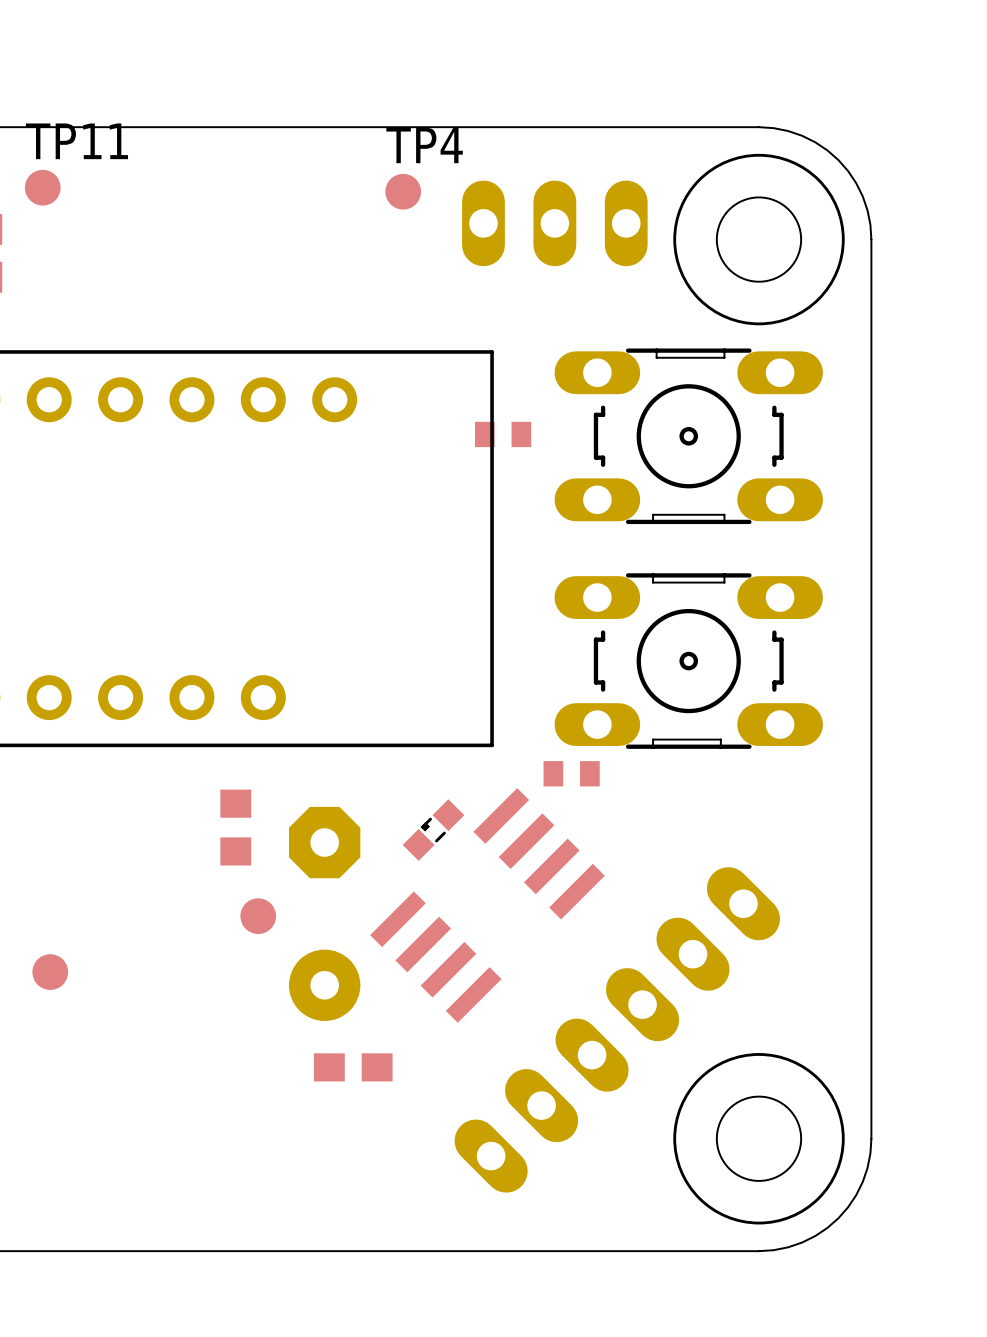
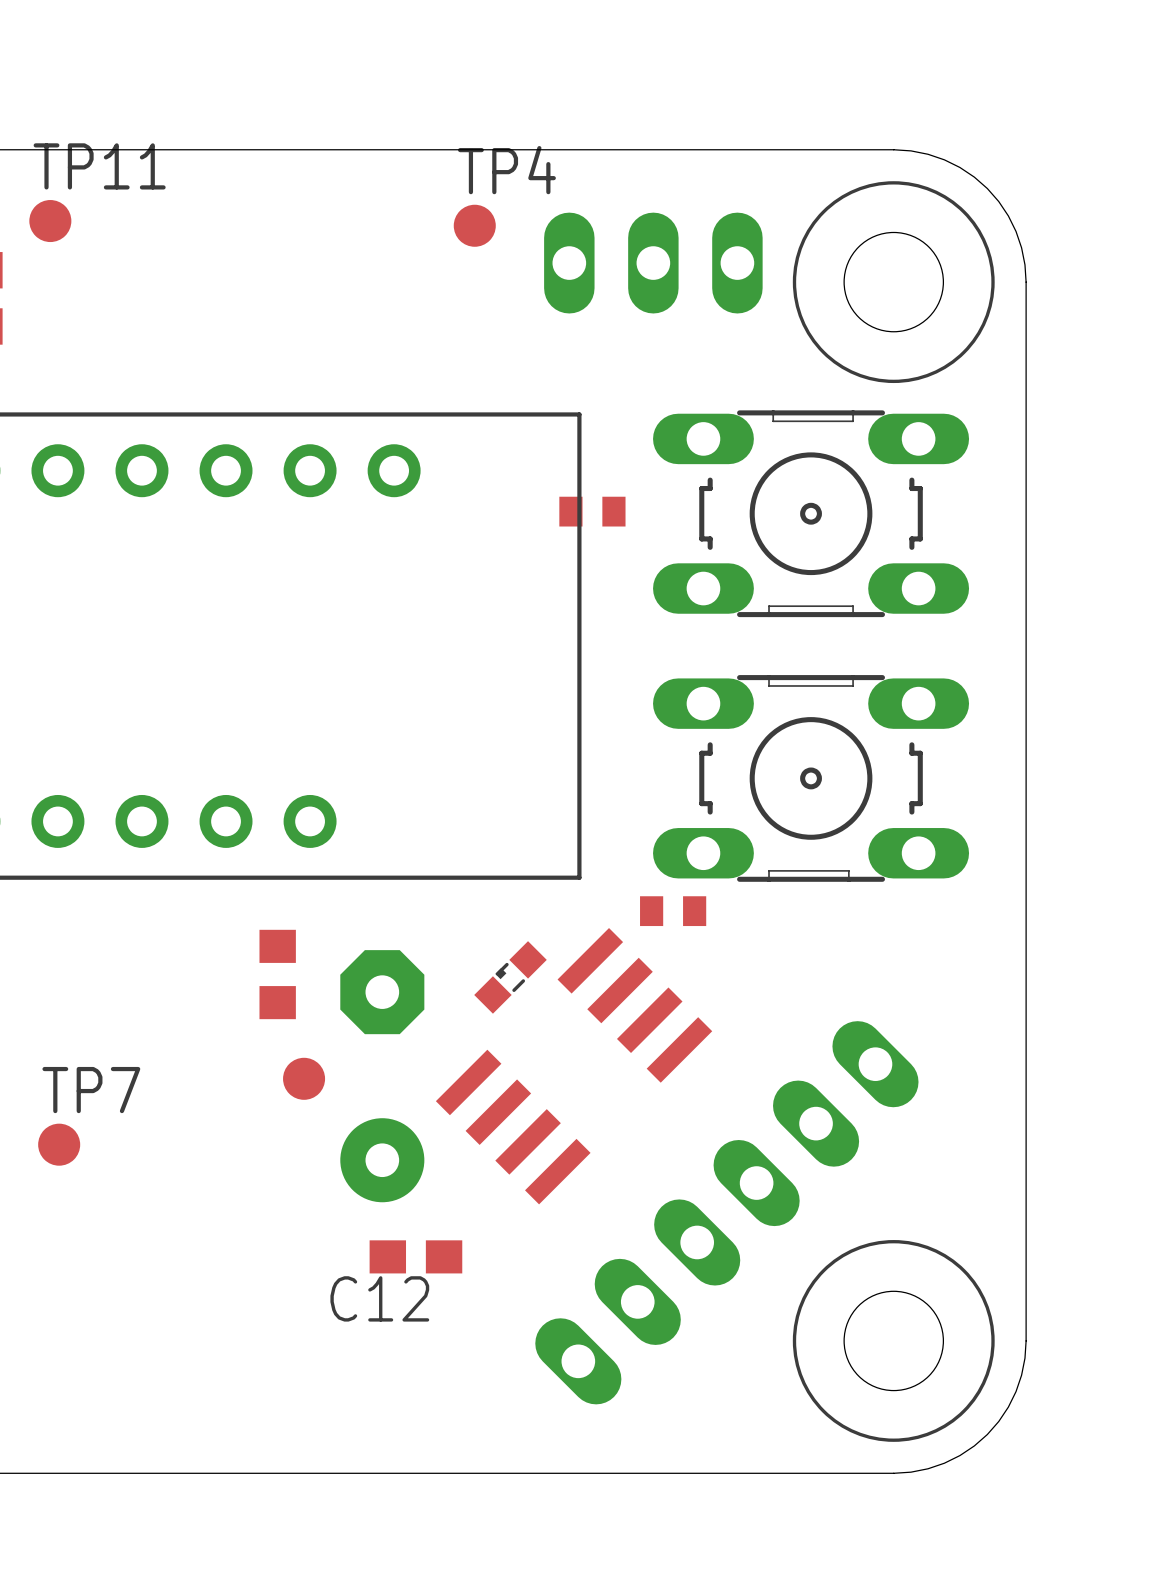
TP7 name: none -> TP7 (91, 1090)
C12 name: none -> C12 (379, 1298)

